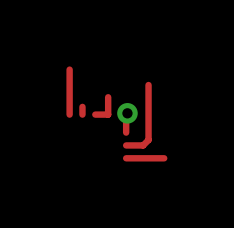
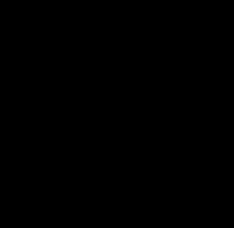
track: (69, 69) (69, 114) -> none
track: (148, 85) (148, 140) (143, 145) (126, 145) -> none
track: (108, 97) (108, 114) (95, 114) -> none
track: (82, 106) (82, 114) -> none
track: (127, 113) (126, 132) -> none
via: (127, 113) -> none
track: (126, 158) (164, 158) -> none

